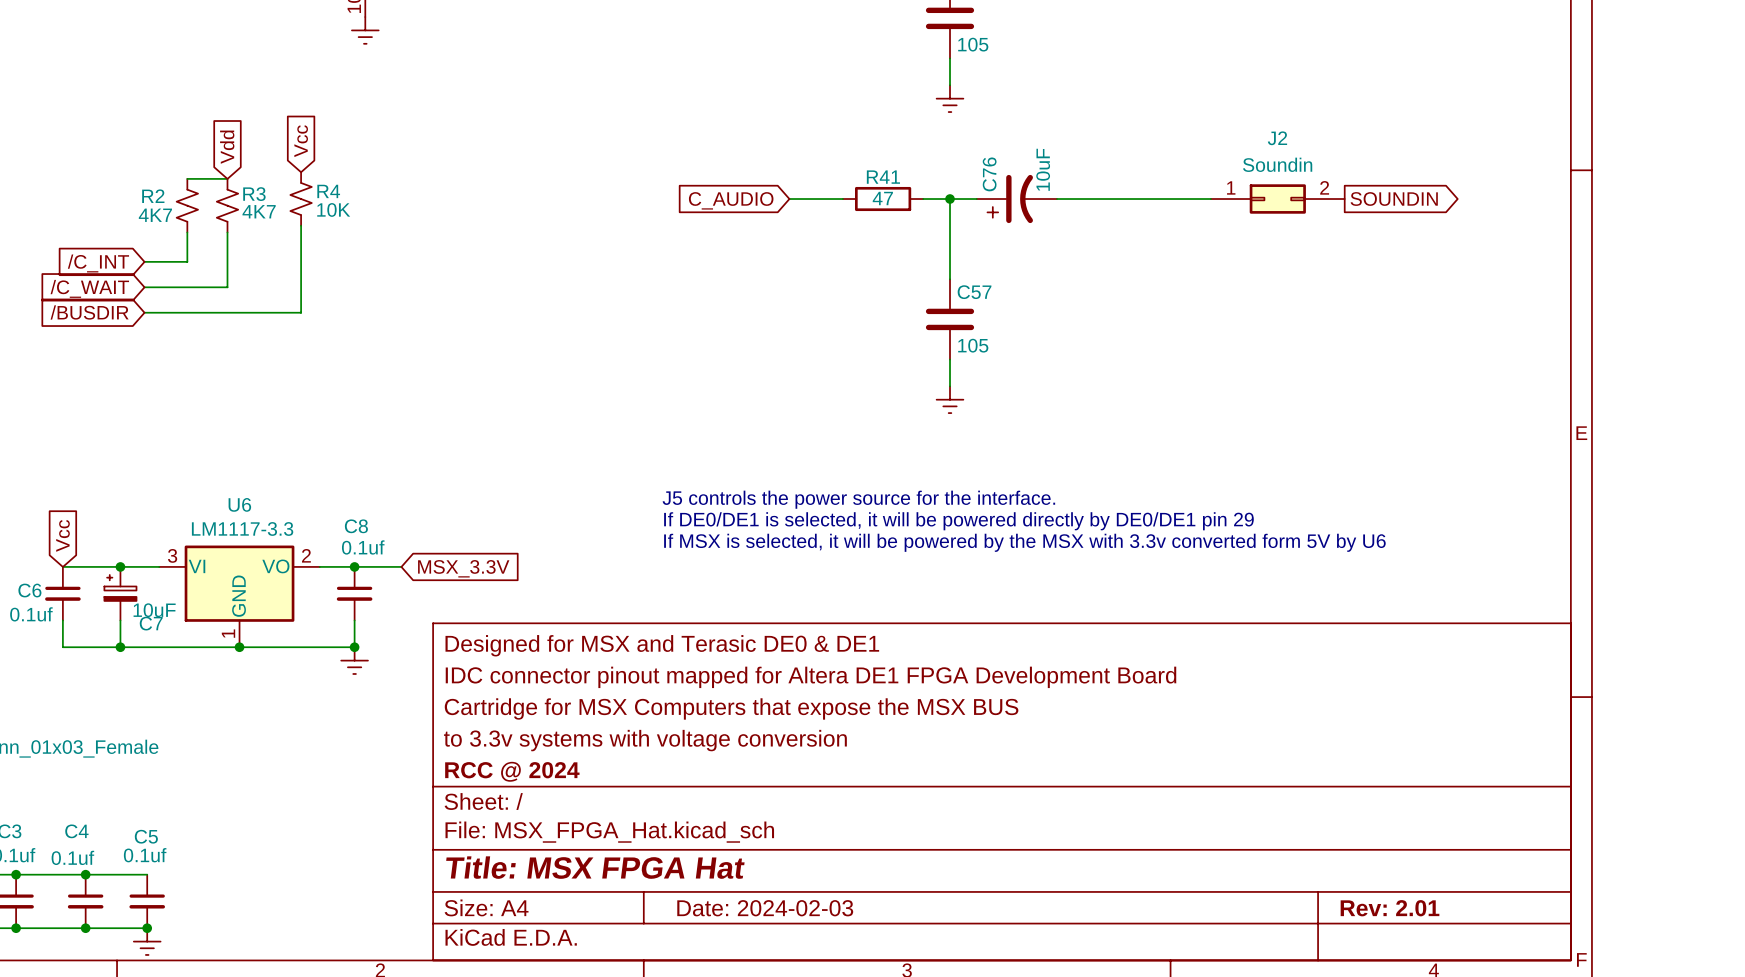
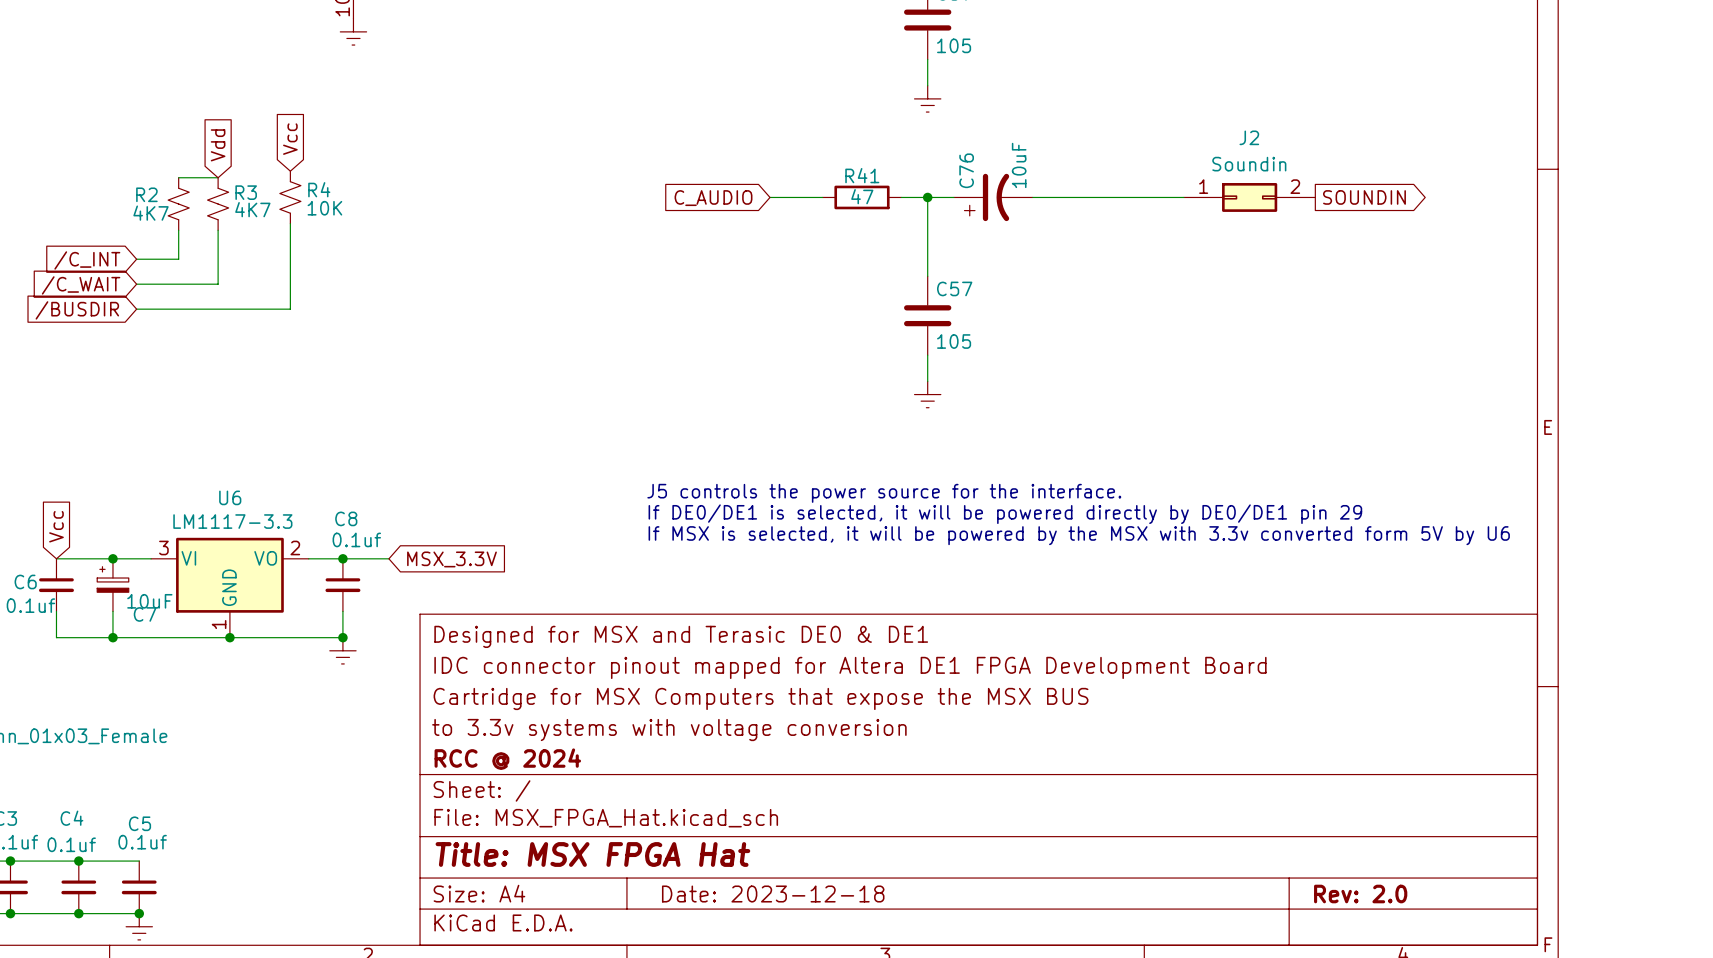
title block: Date: 2024-02-03 (765, 908) -> Date: 2023-12-18 (773, 894)
title block: Rev: 2.01 (1390, 908) -> Rev: 2.0 (1360, 894)

